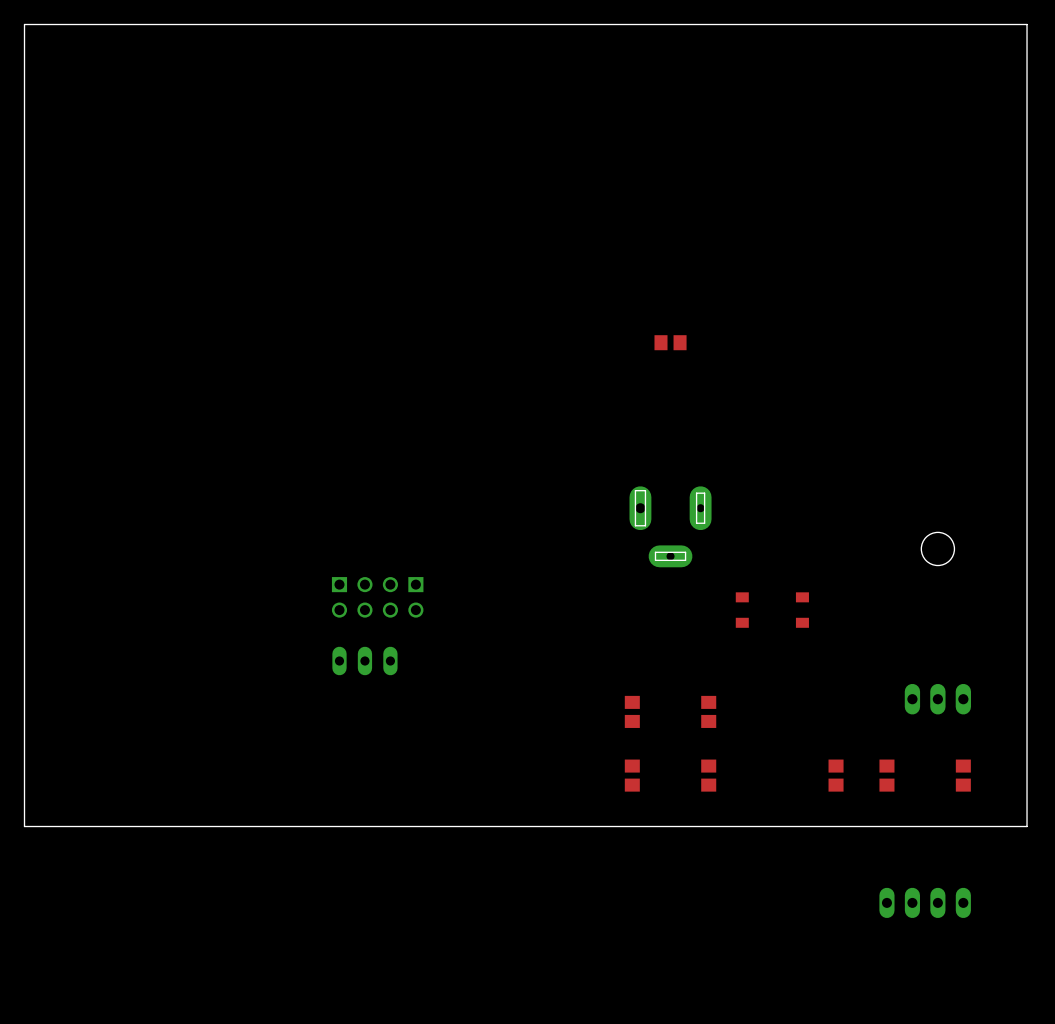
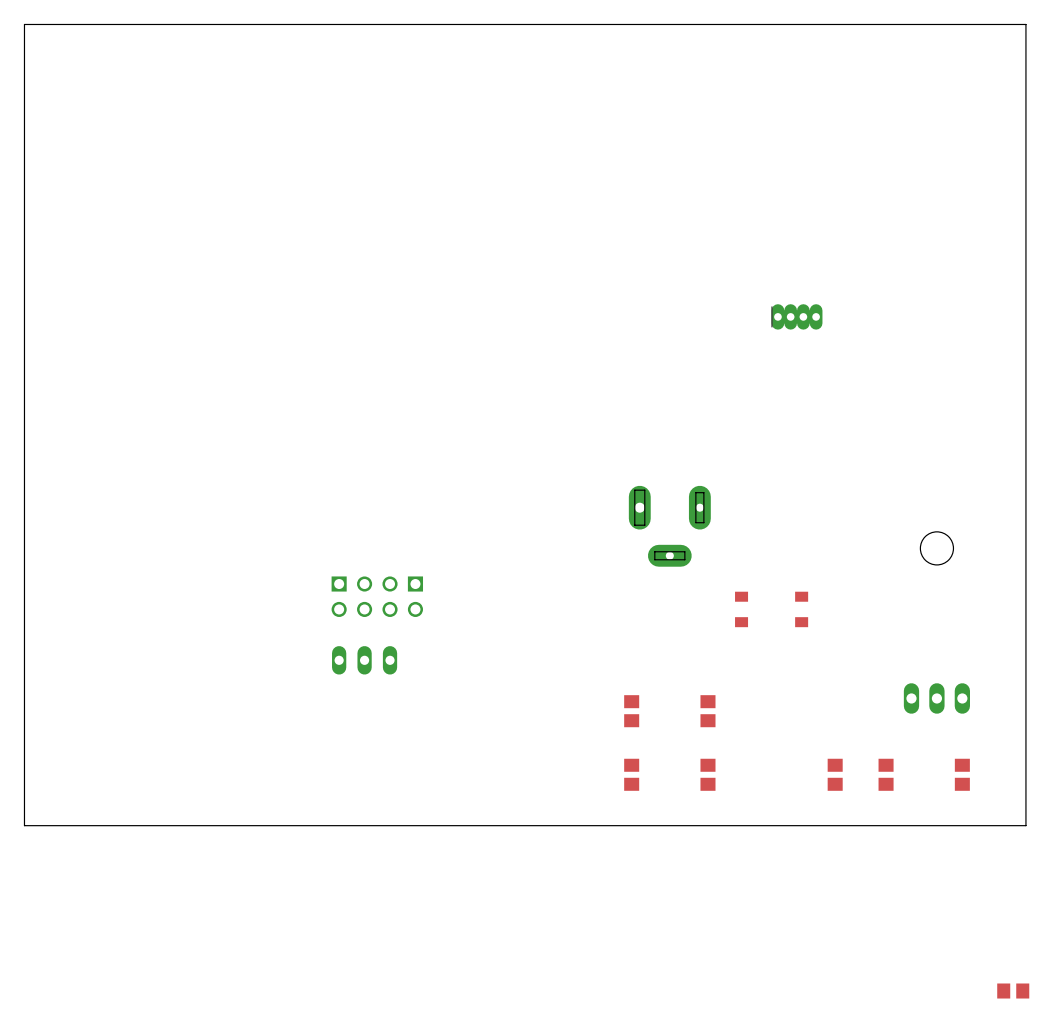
part: none -> (796, 316)
part: (670, 342) -> none
part: (925, 902) -> none
part: none -> (1013, 991)

